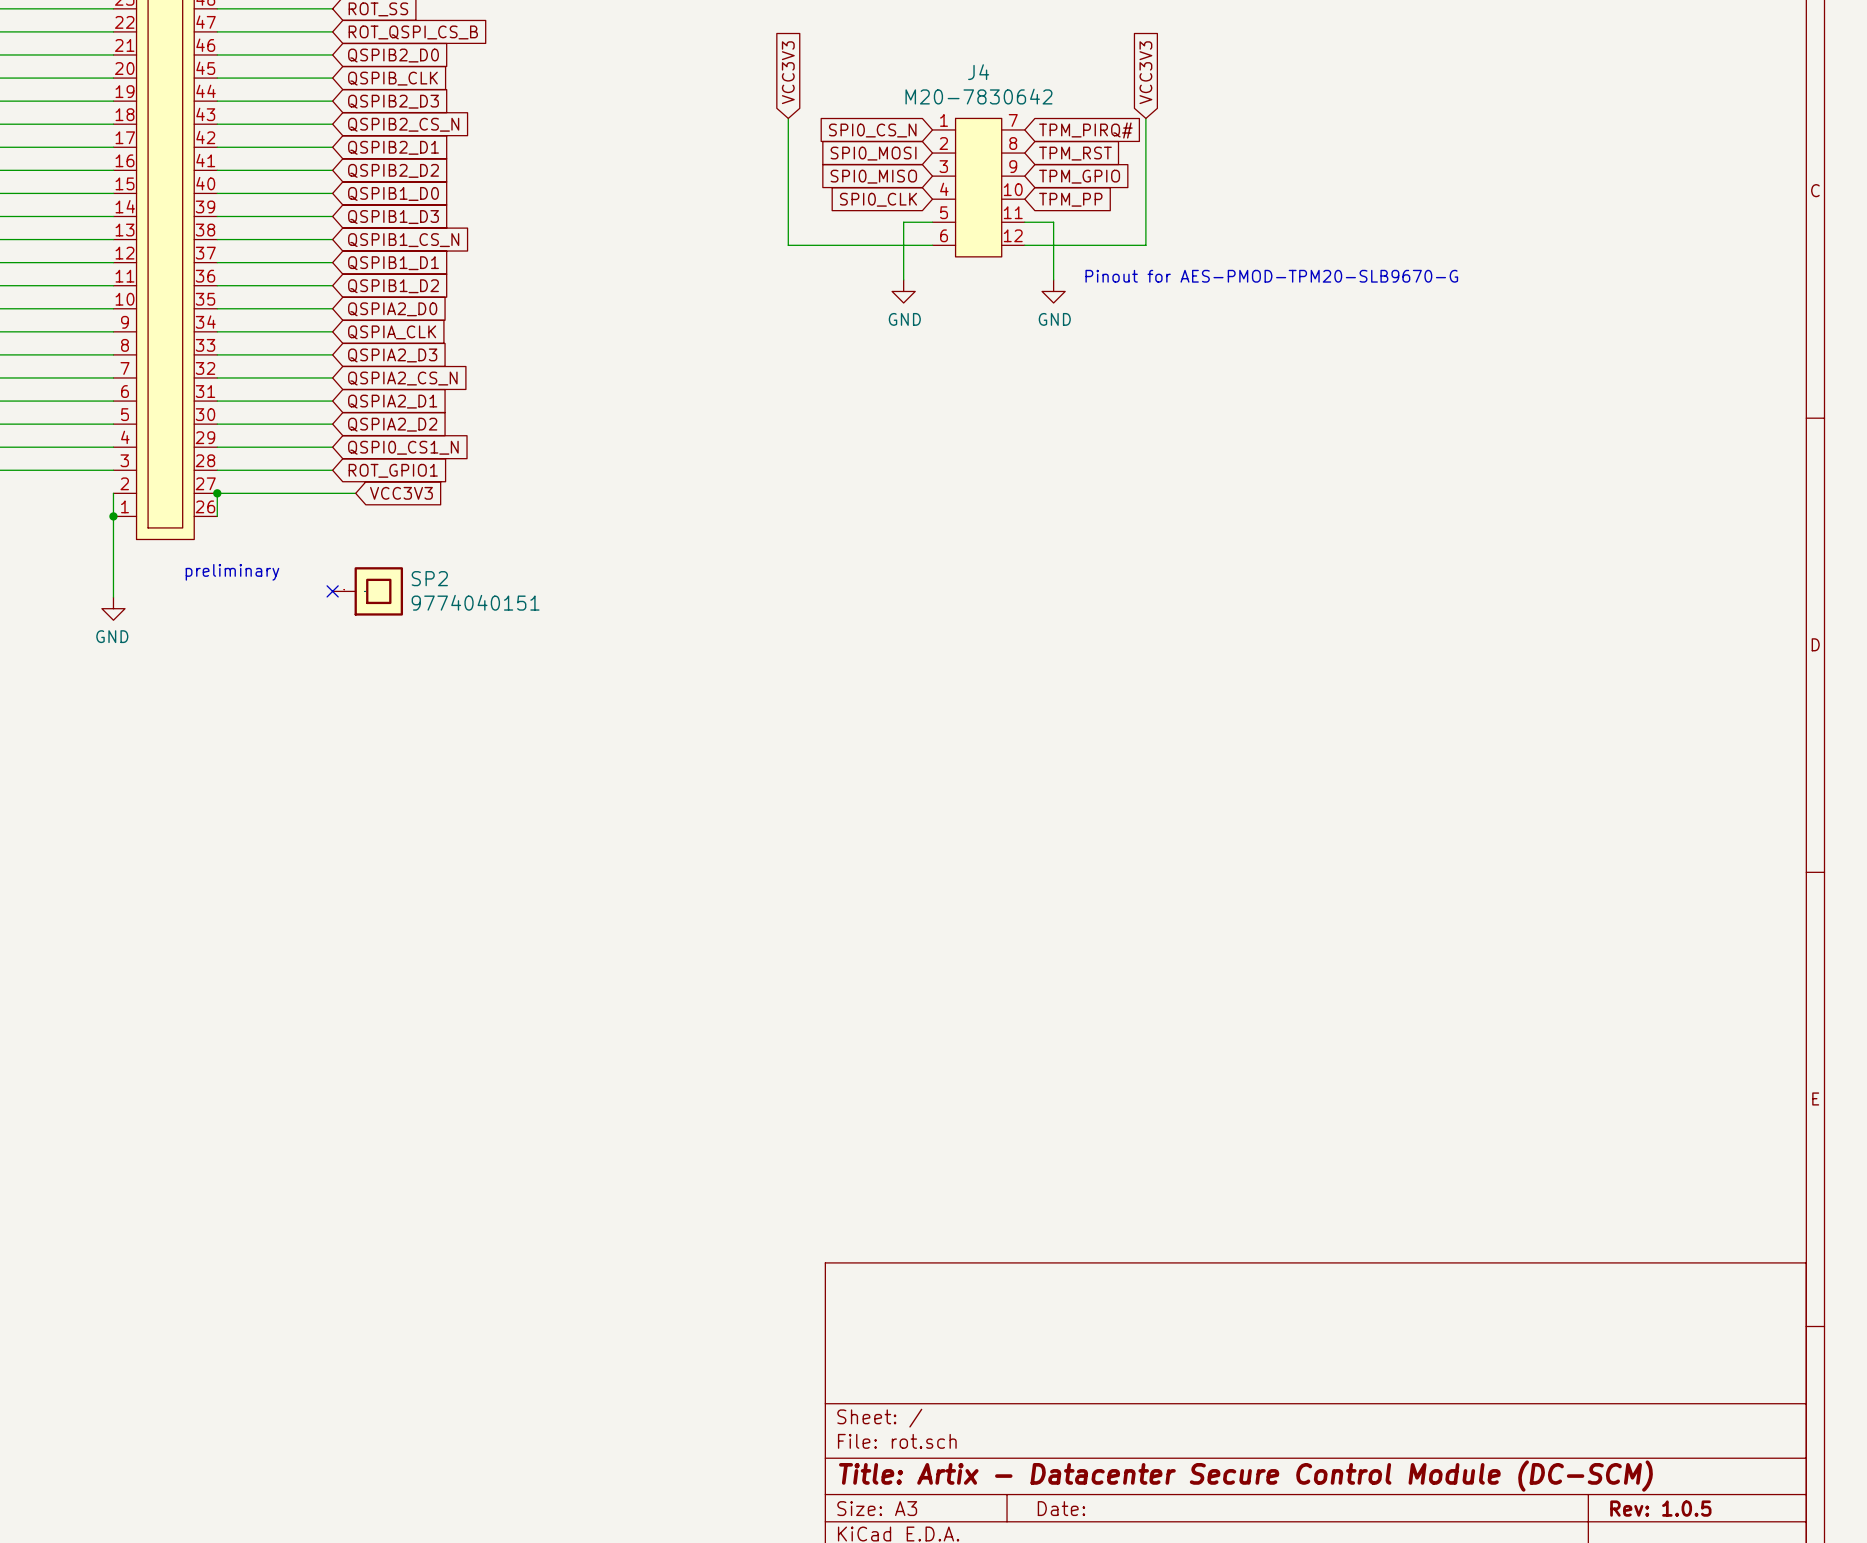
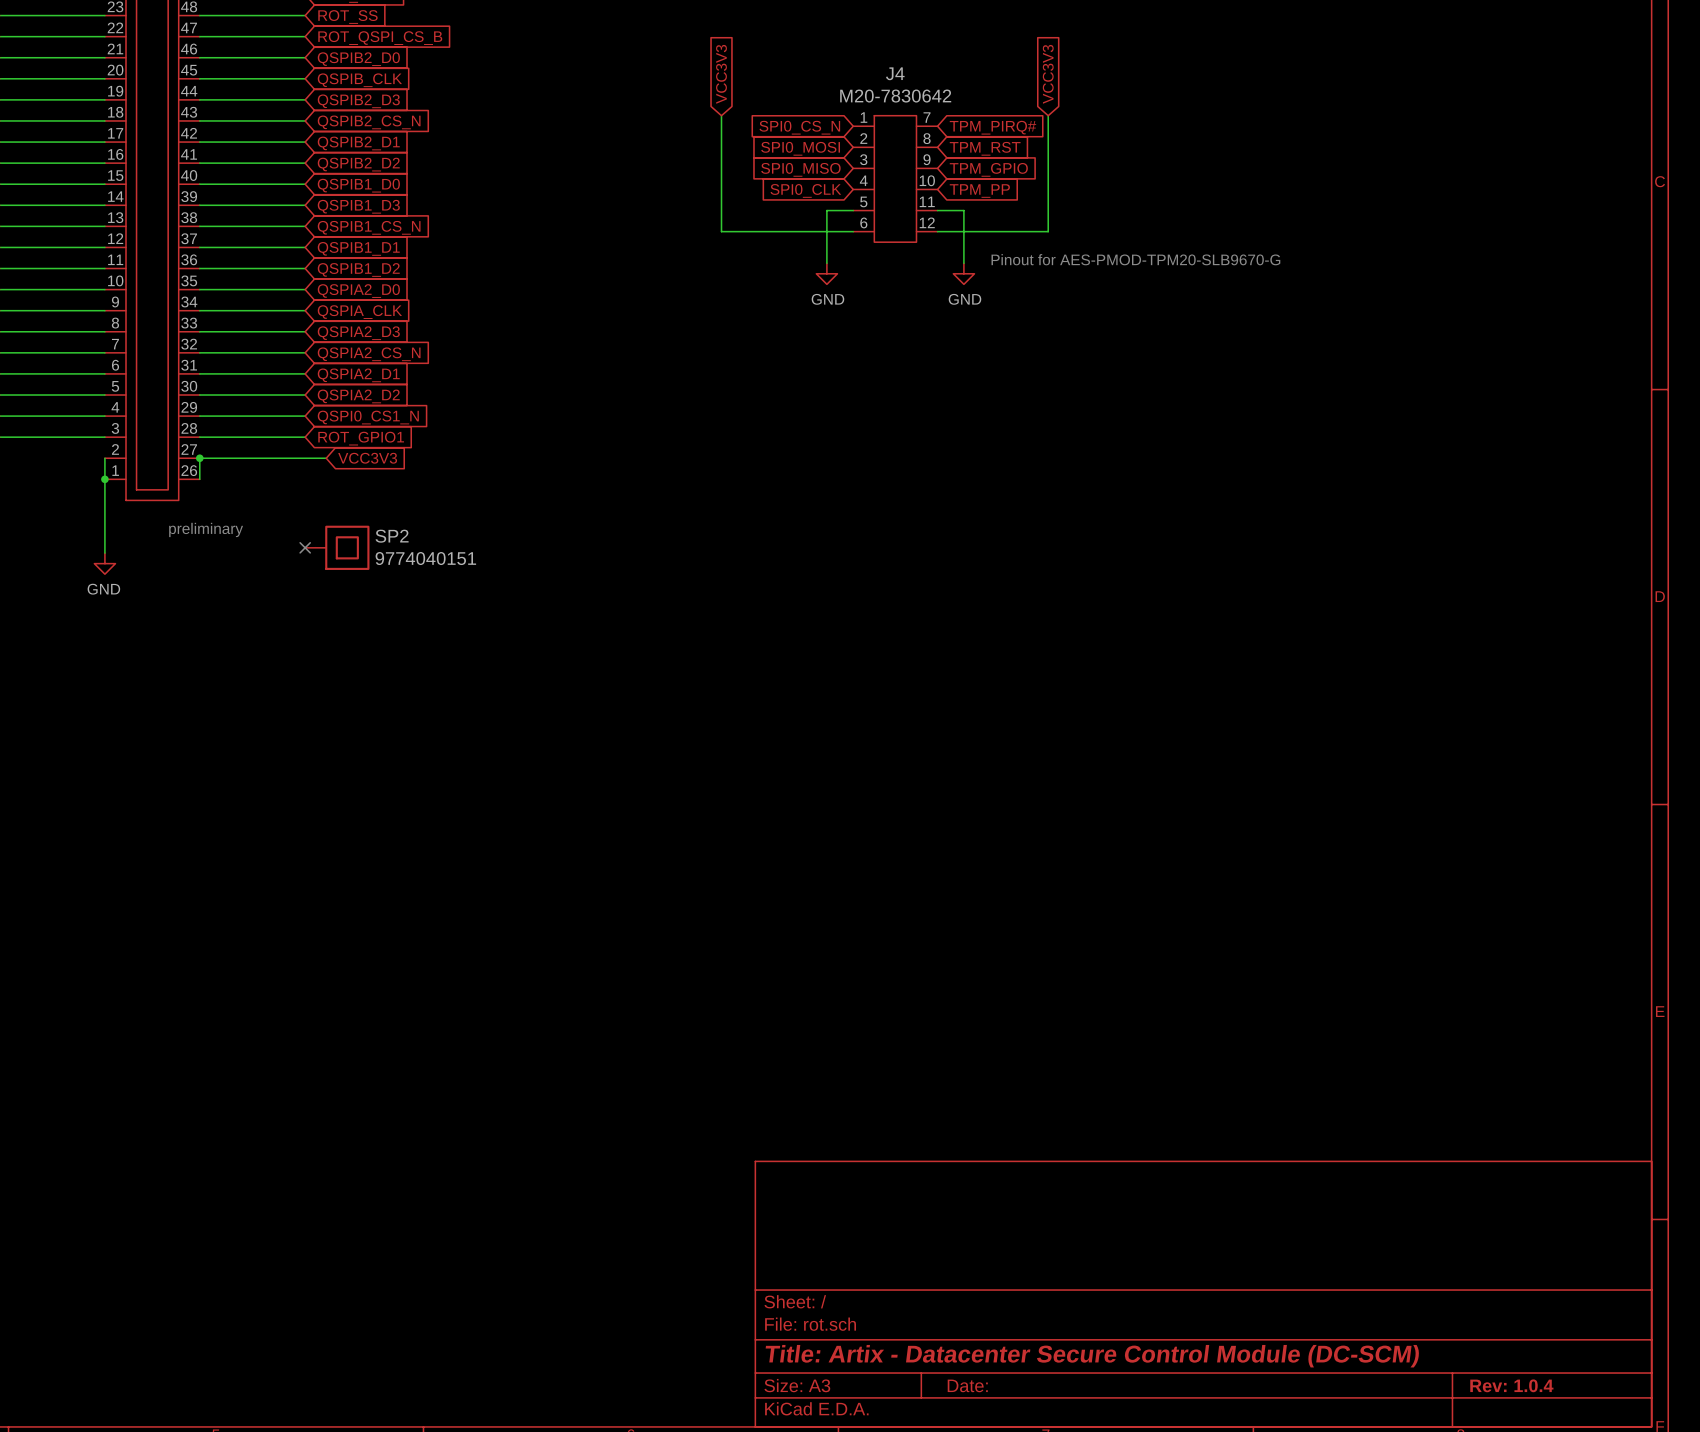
title block: Rev: 1.0.5 (1660, 1508) -> Rev: 1.0.4 (1511, 1385)

